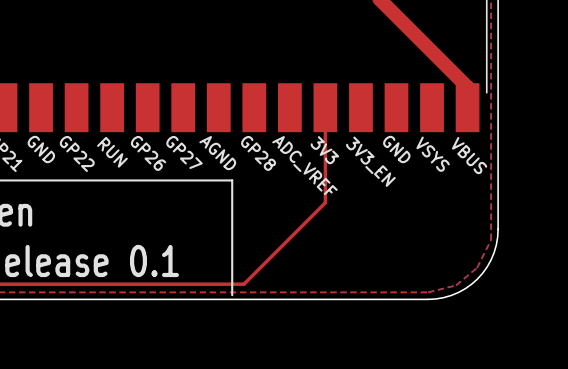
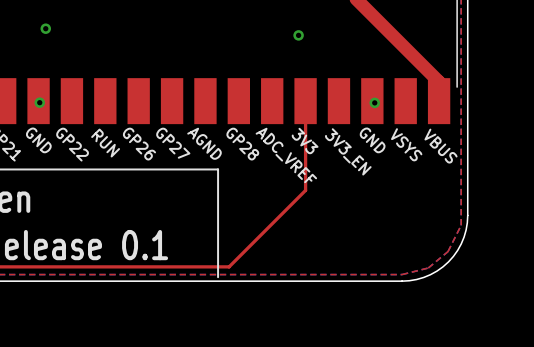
via: none -> (45, 28)
via: none -> (298, 35)
via: none -> (39, 102)
via: none -> (374, 102)

